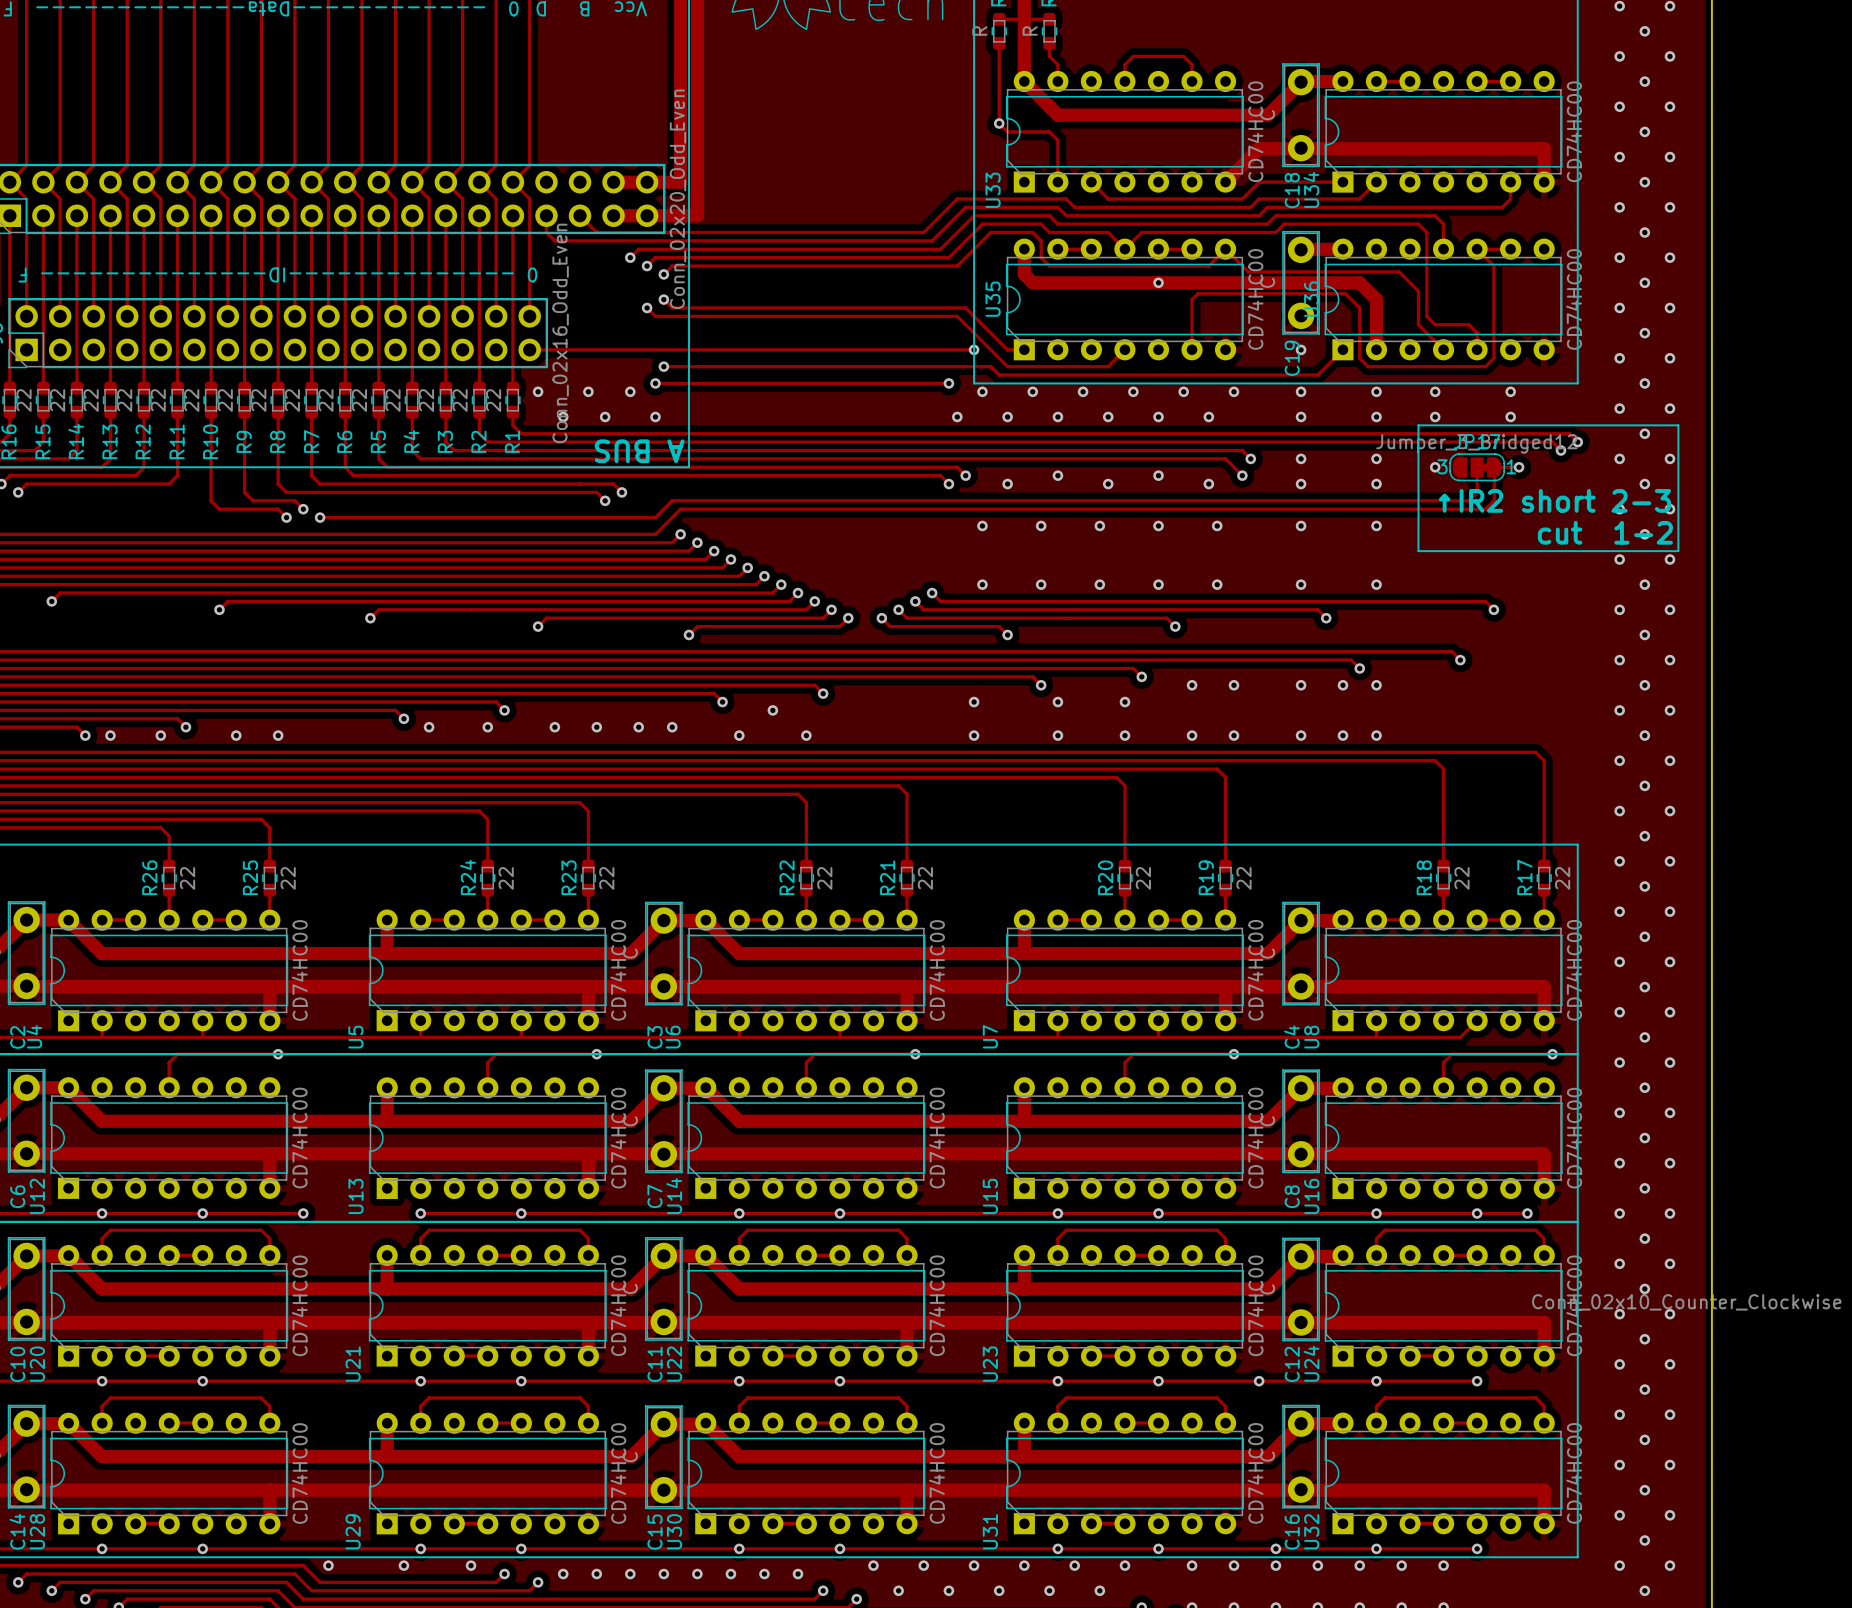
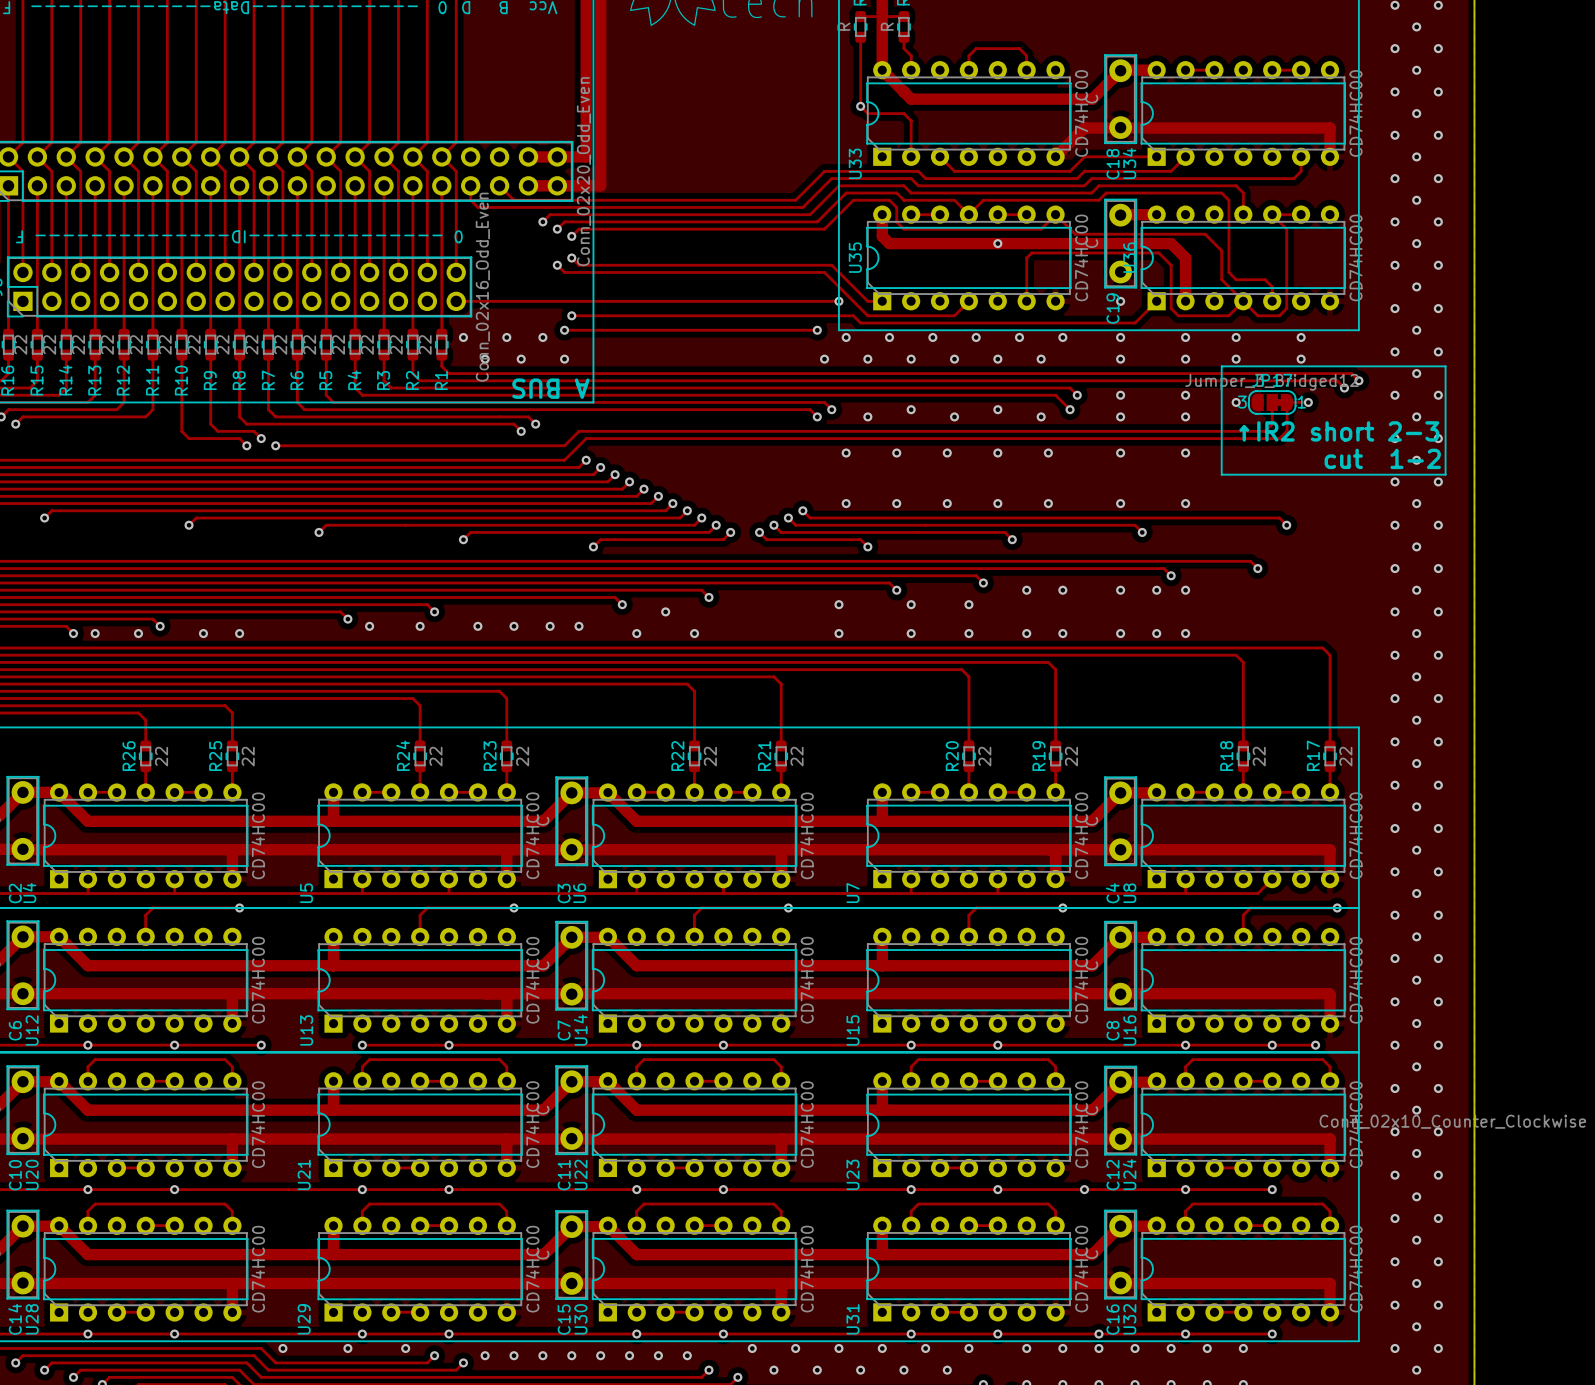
track: (1426, 366) (1460, 366) -> (1228, 315) (1243, 301)

